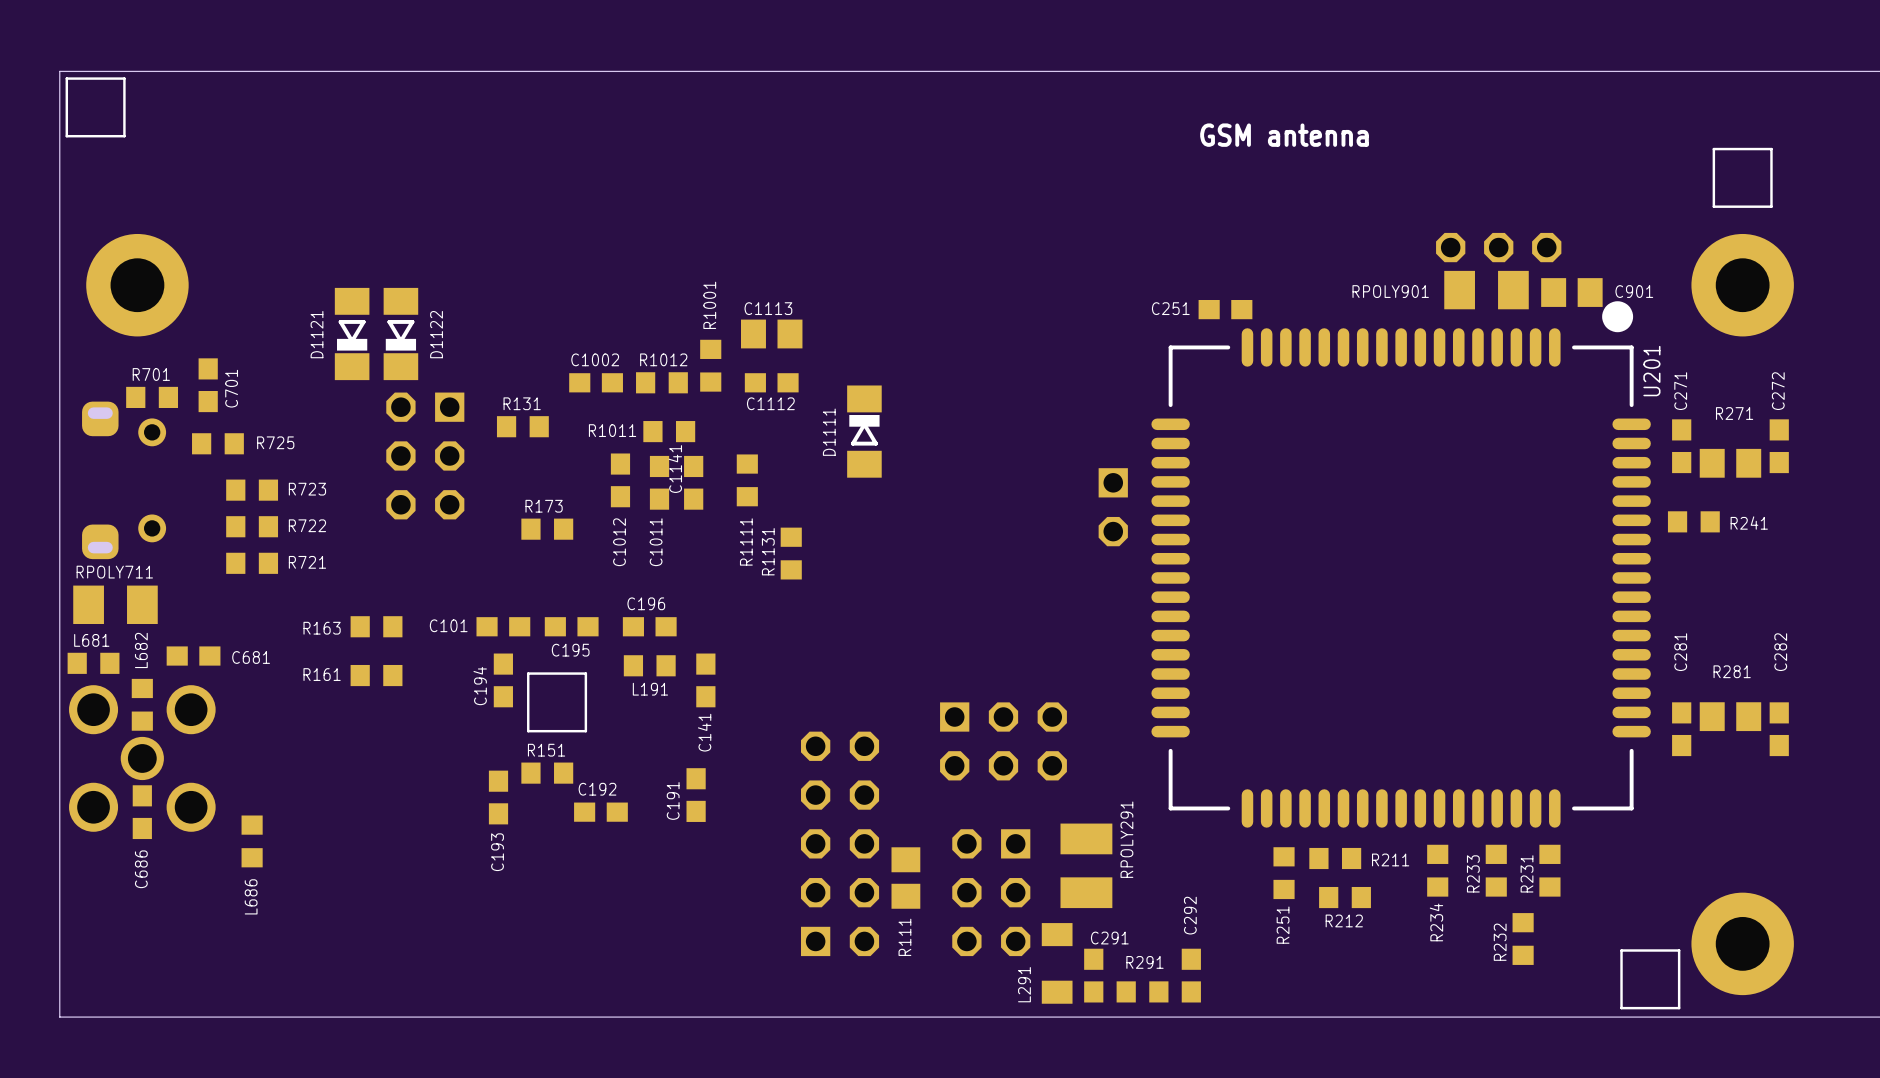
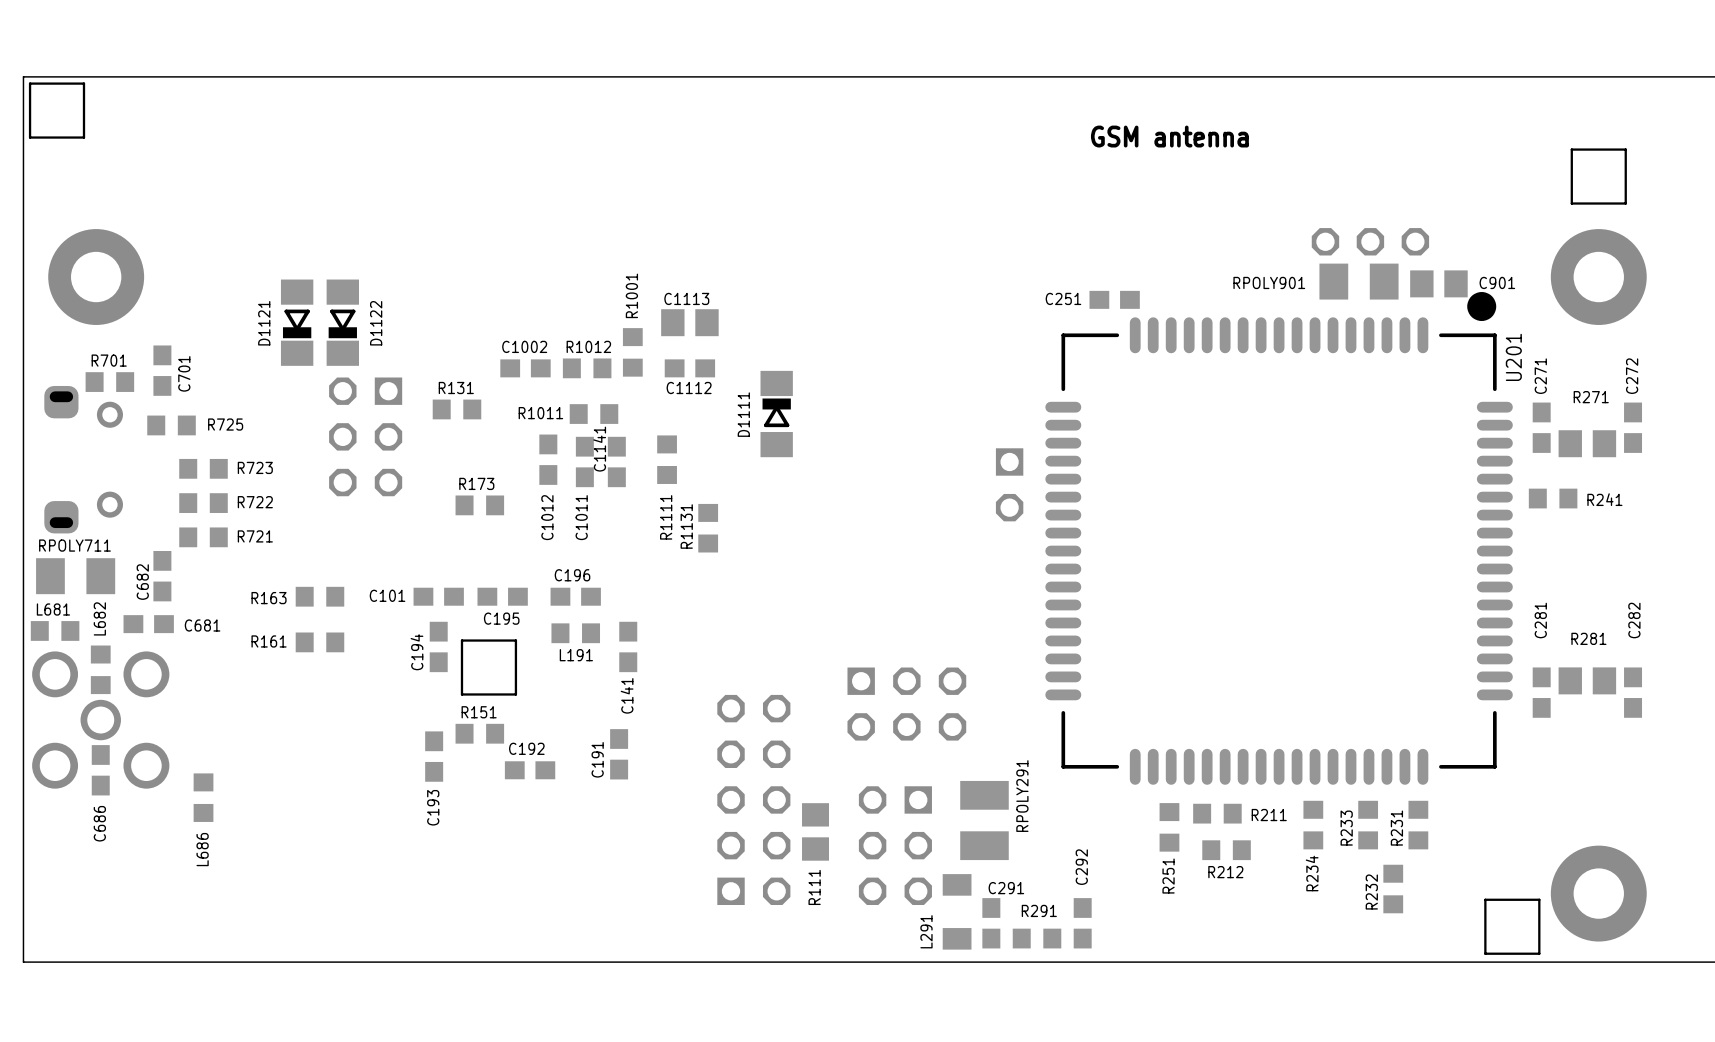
C682: none -> (162, 576)

